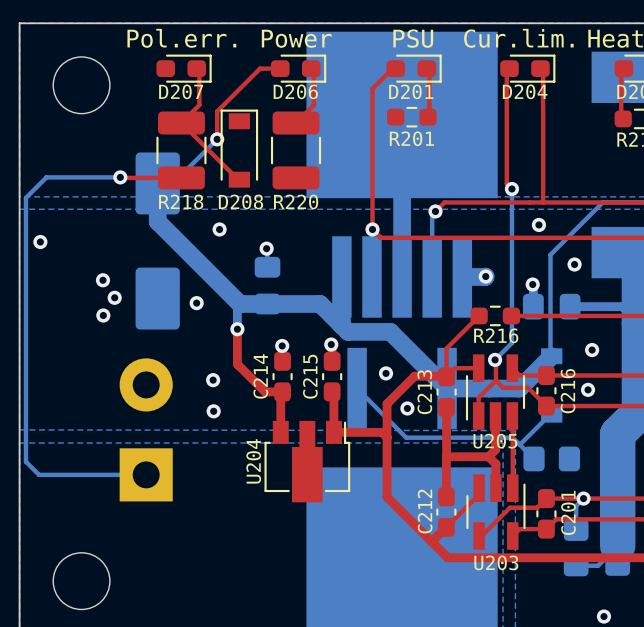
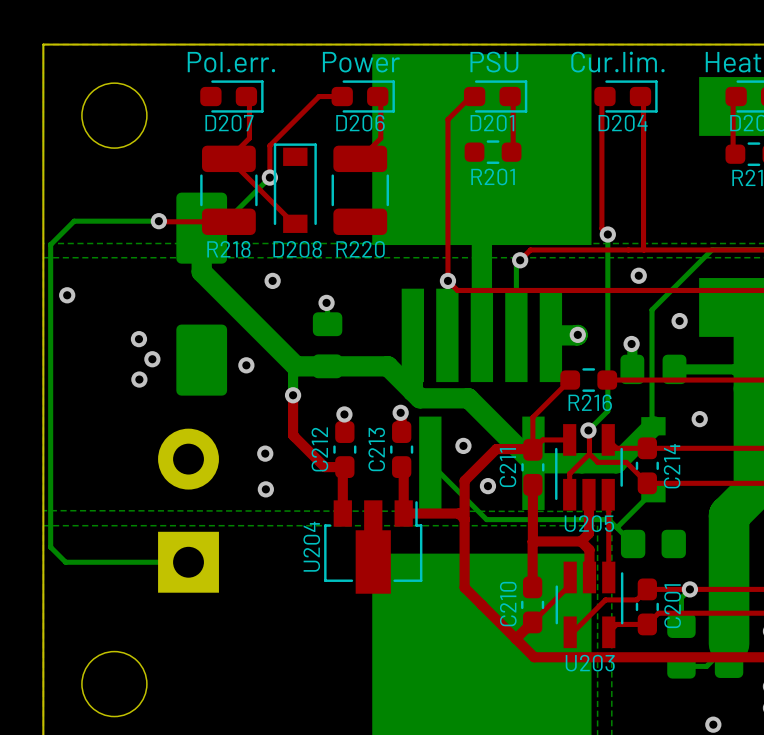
C214 name: C214 (260, 376) -> C212 (319, 449)
C215 name: C215 (310, 376) -> C213 (376, 449)
via: (588, 389) -> none
C216 name: C216 (568, 391) -> C214 (672, 466)
C213 name: C213 (424, 392) -> C211 (507, 467)
C212 name: C212 (425, 511) -> C210 (508, 604)

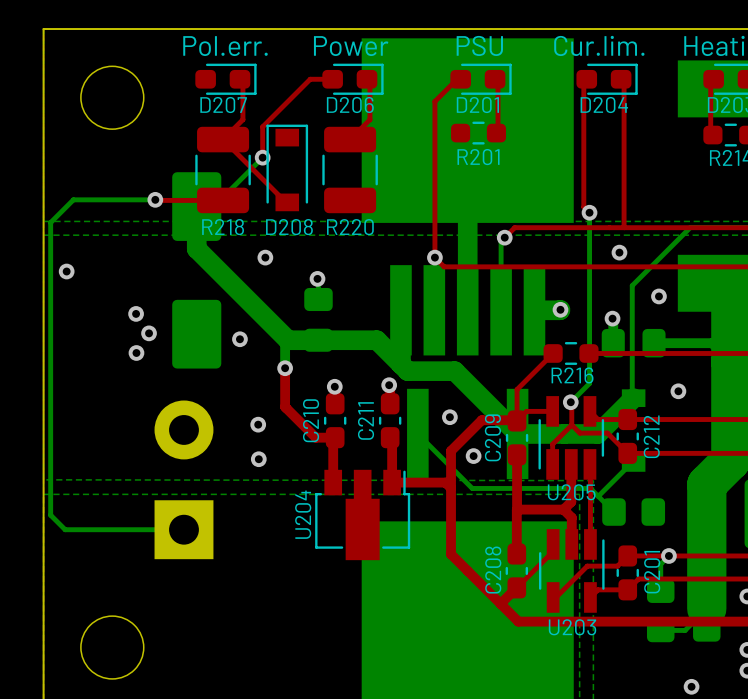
C212 name: C212 (319, 449) -> C210 (311, 420)
C213 name: C213 (376, 449) -> C211 (366, 420)
C214 name: C214 (672, 466) -> C212 (651, 436)
C211 name: C211 (507, 467) -> C209 (492, 437)
C210 name: C210 (508, 604) -> C208 (493, 570)

